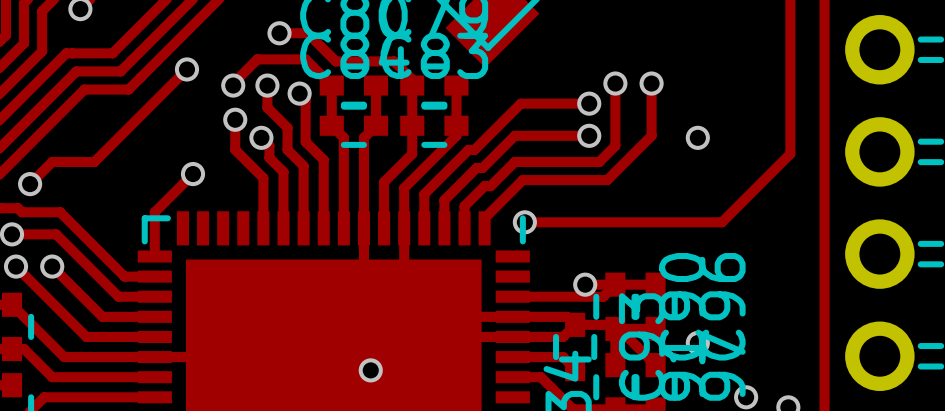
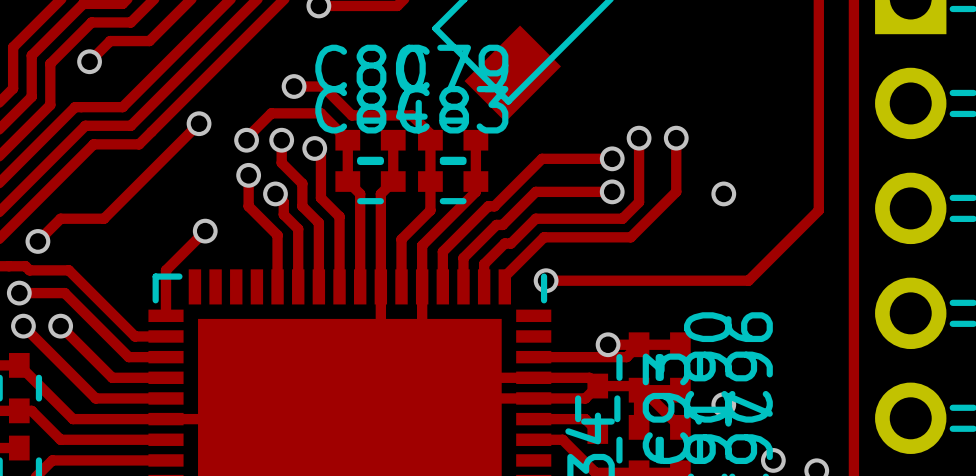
via: (370, 370) -> none

